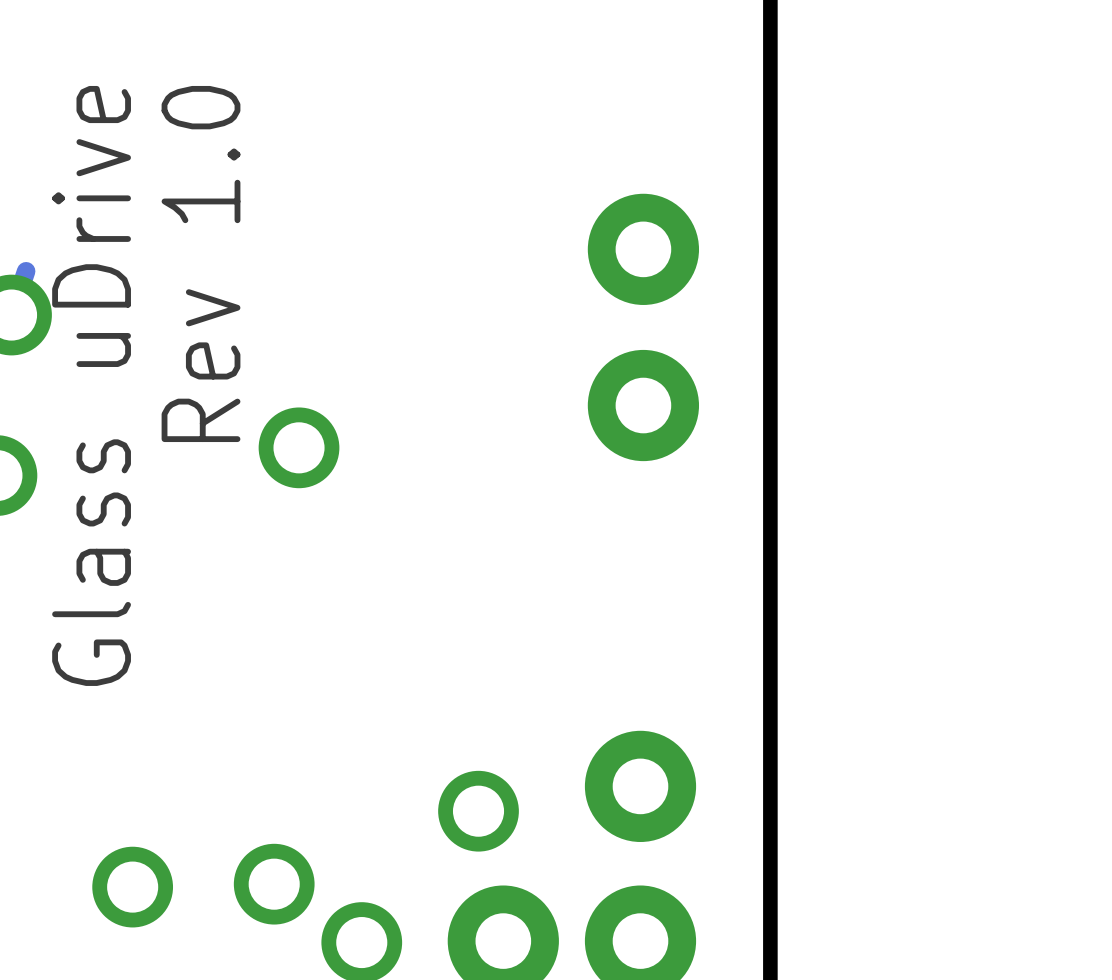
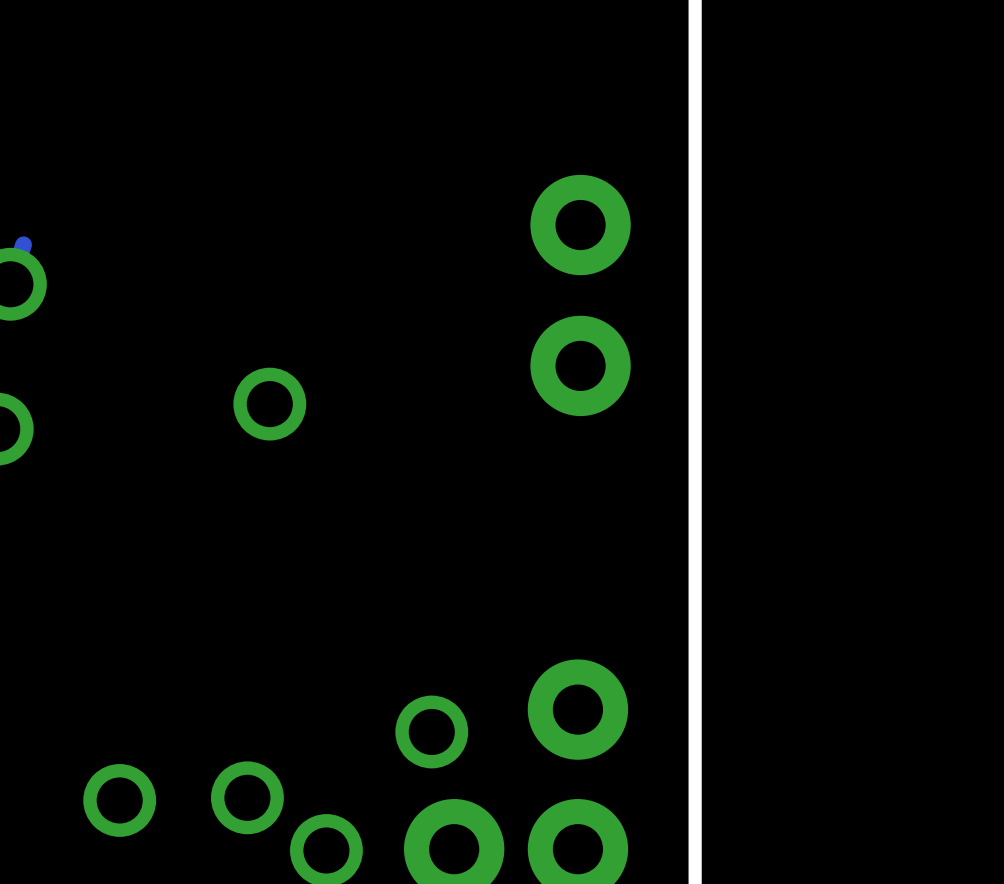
text: Rev 1.0 (201, 264) -> none
text: Glass uDrive (91, 385) -> none

